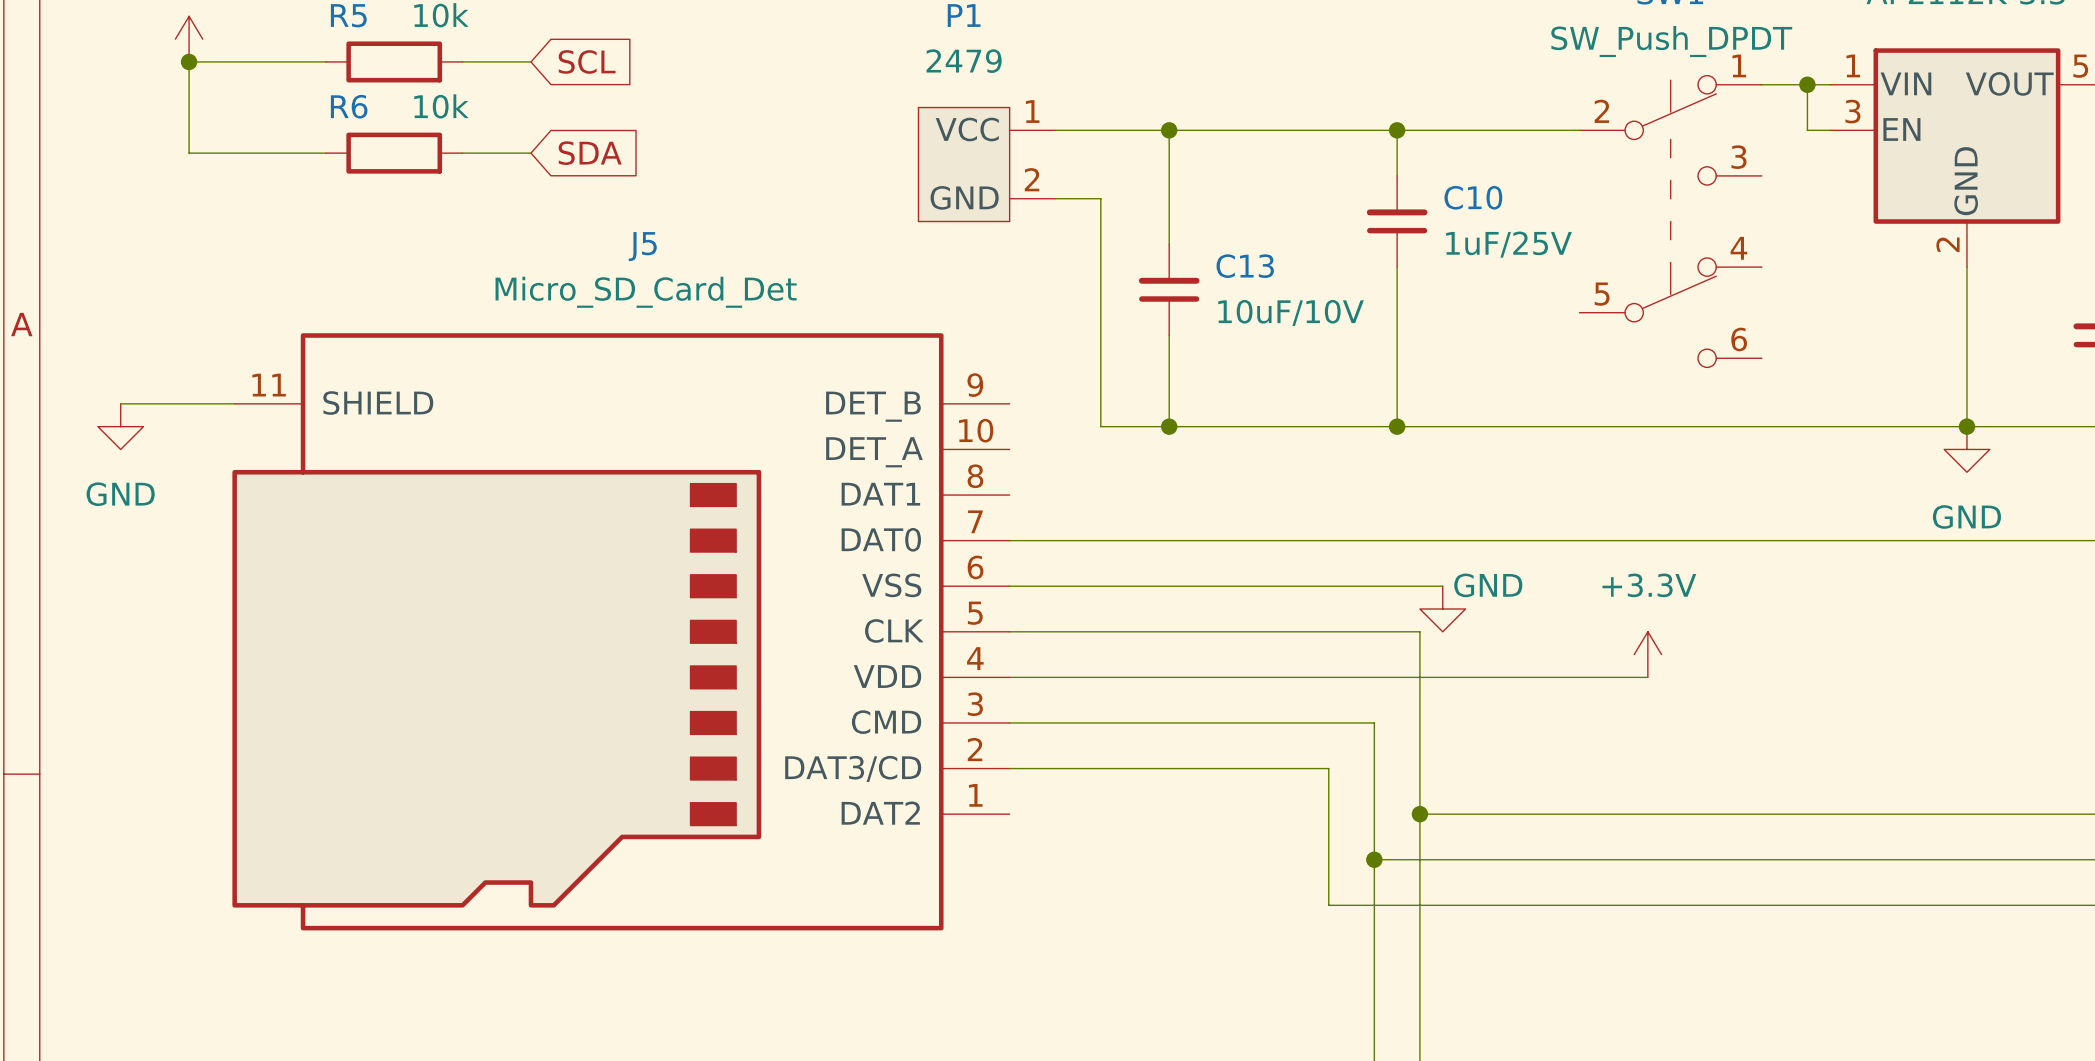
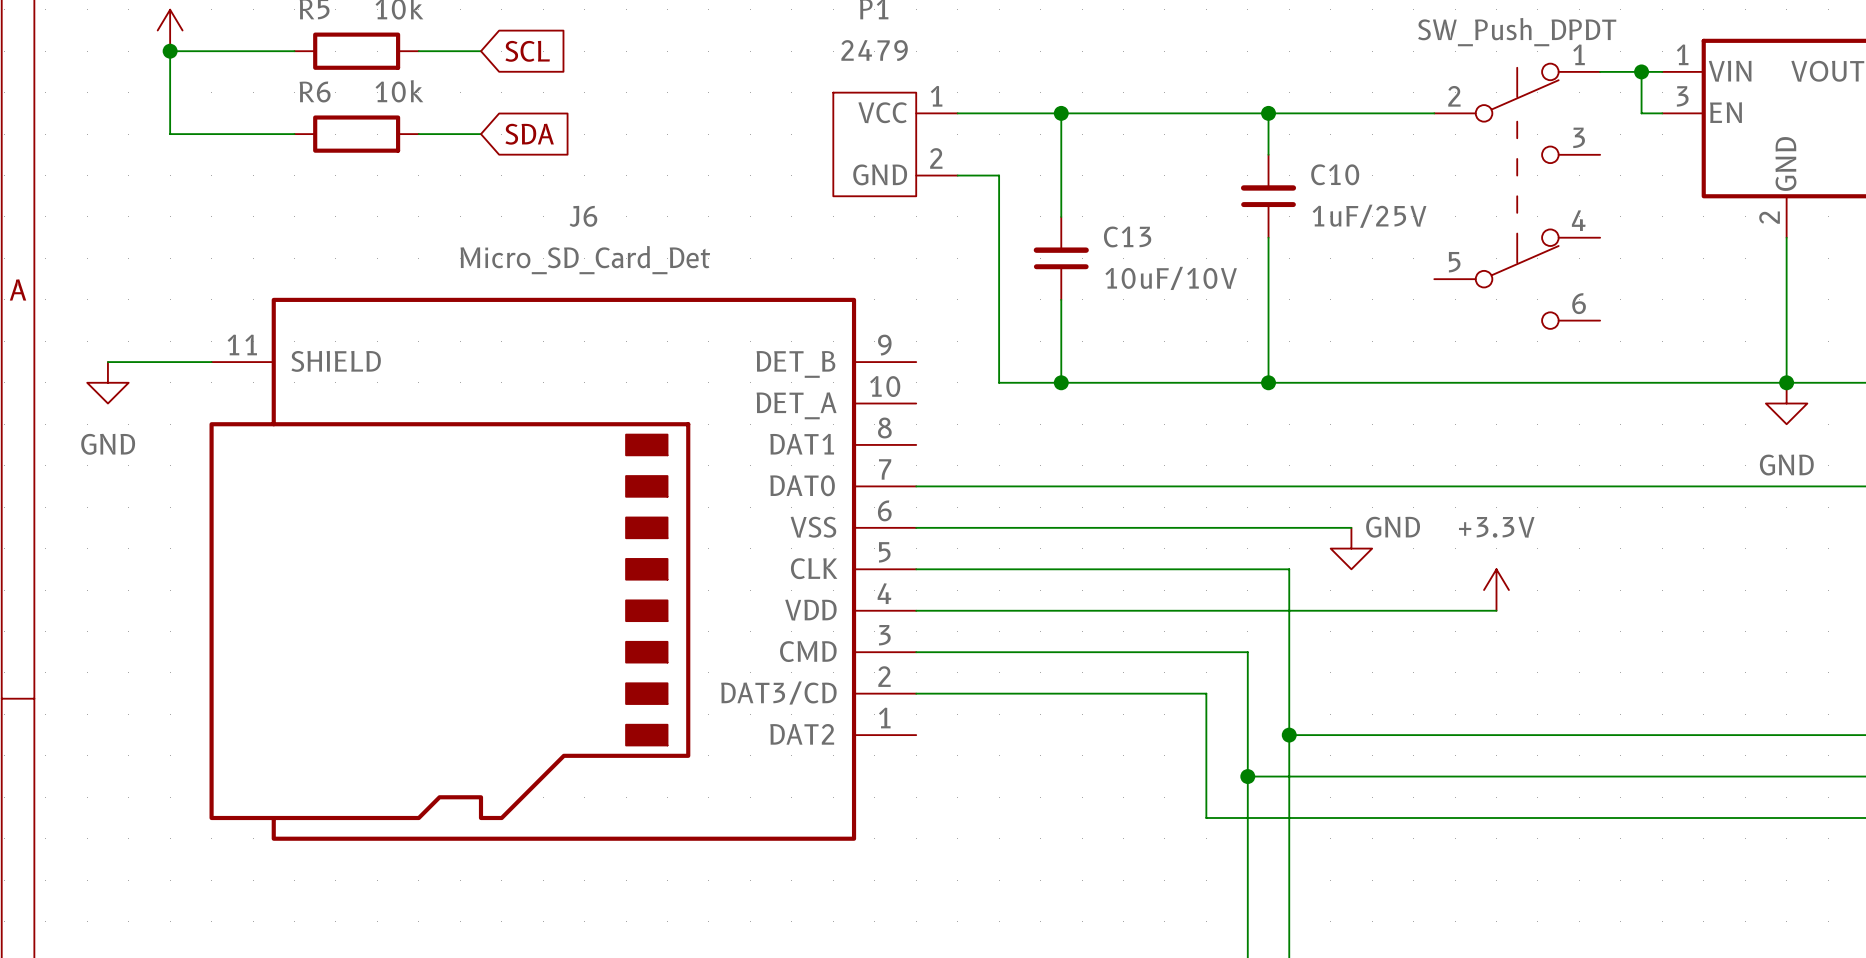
J5 name: J5 (642, 246) -> J6 (583, 216)
wire: none -> (1309, 527) (1351, 527)
power symbol position: GND (1442, 609) -> GND (1351, 548)

